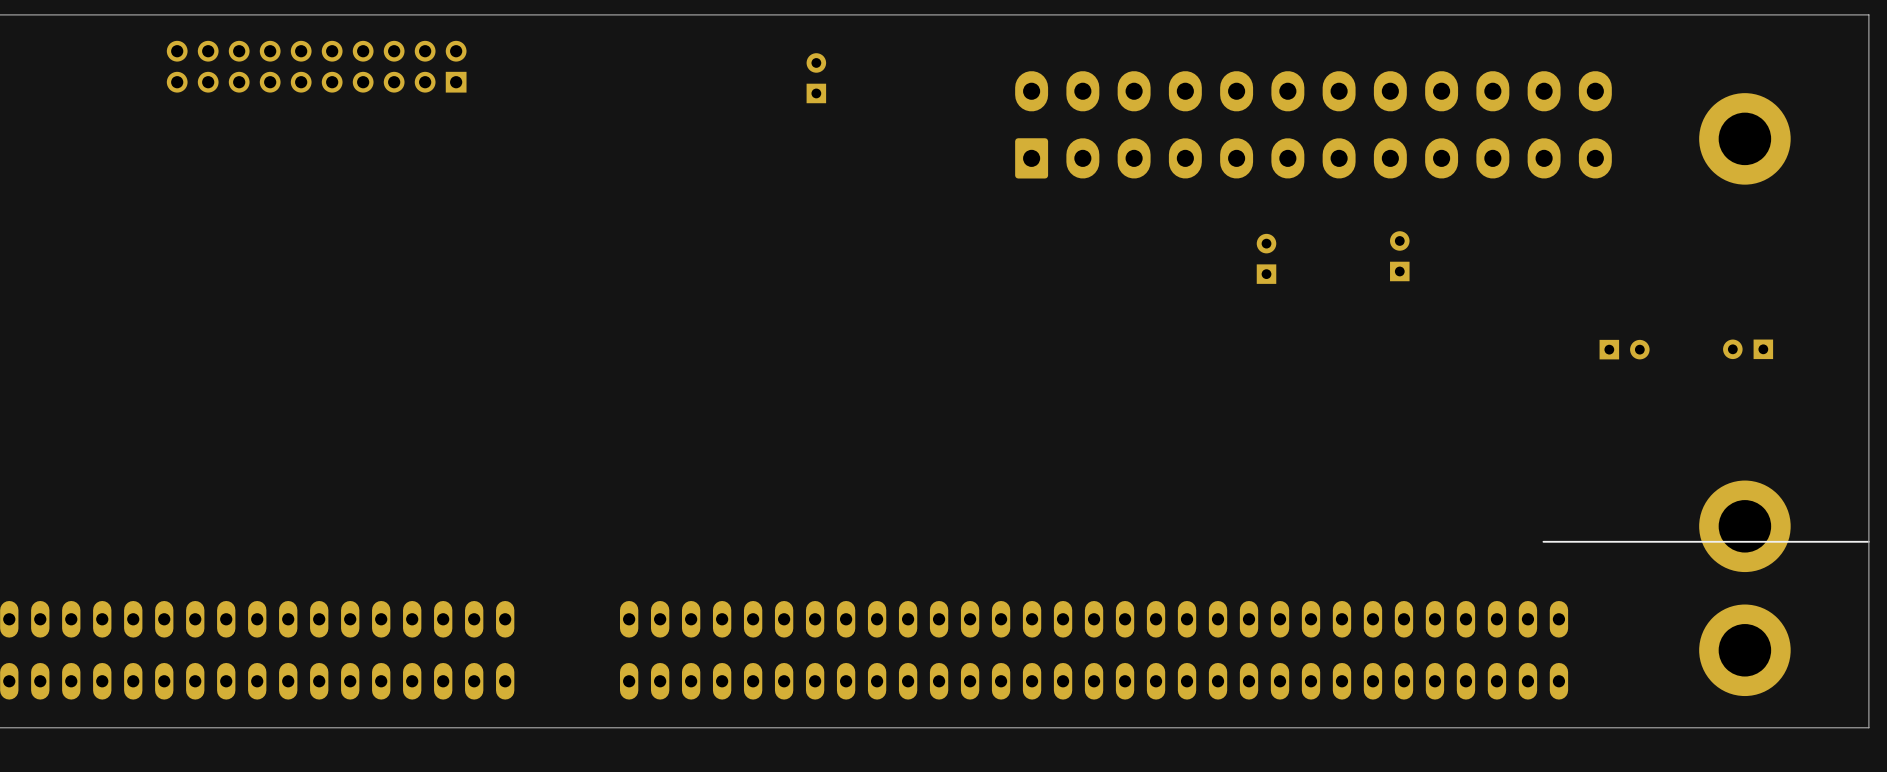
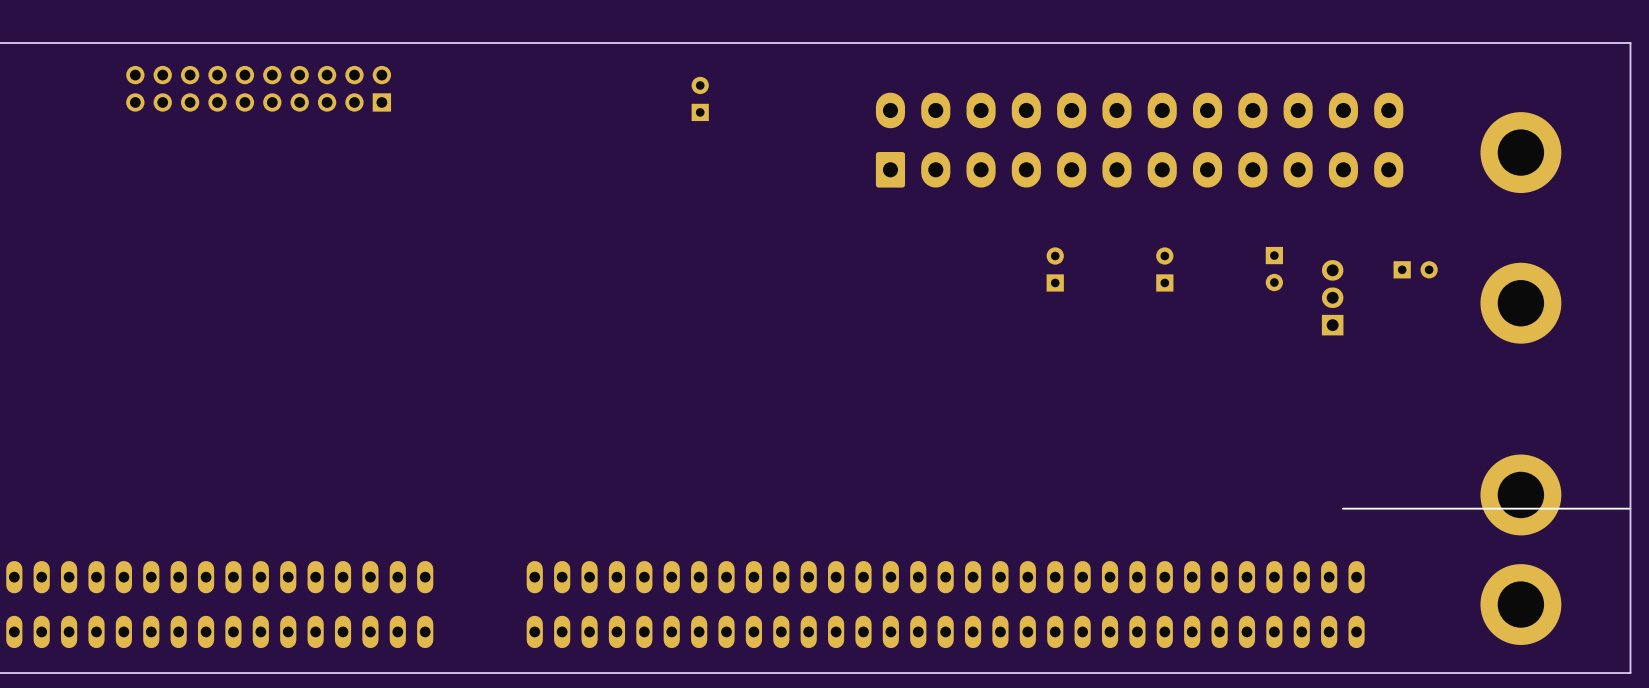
part: (1399, 256) -> none
part: (1266, 258) -> none
part: none -> (1274, 269)
part: none -> (1055, 269)
part: none -> (1164, 269)
part: none -> (1415, 269)
part: none -> (1332, 297)
part: none -> (1520, 303)
part: (1624, 349) -> none
part: (1748, 349) -> none

